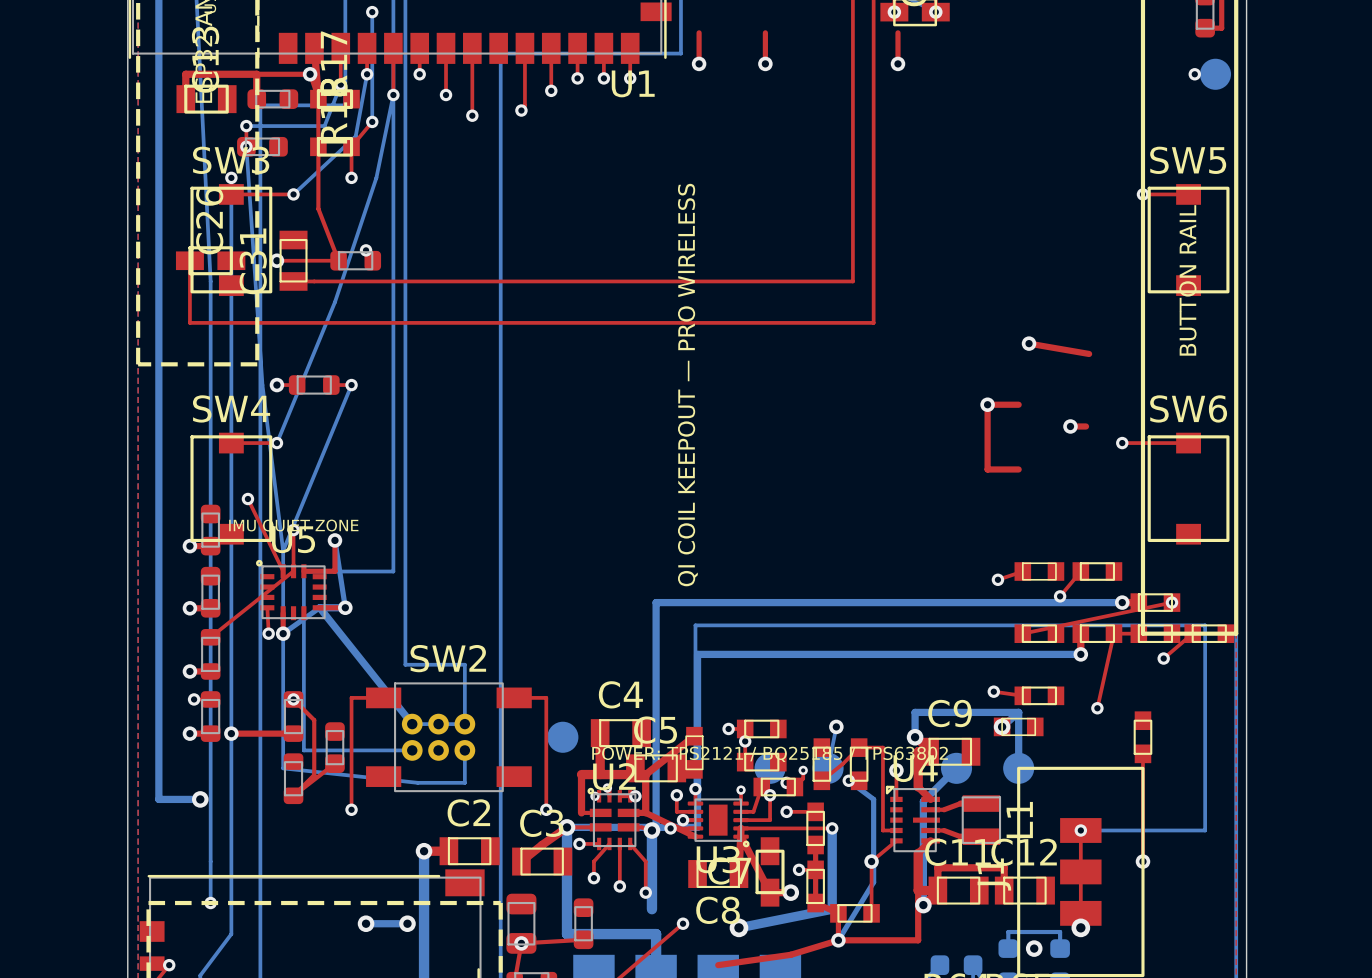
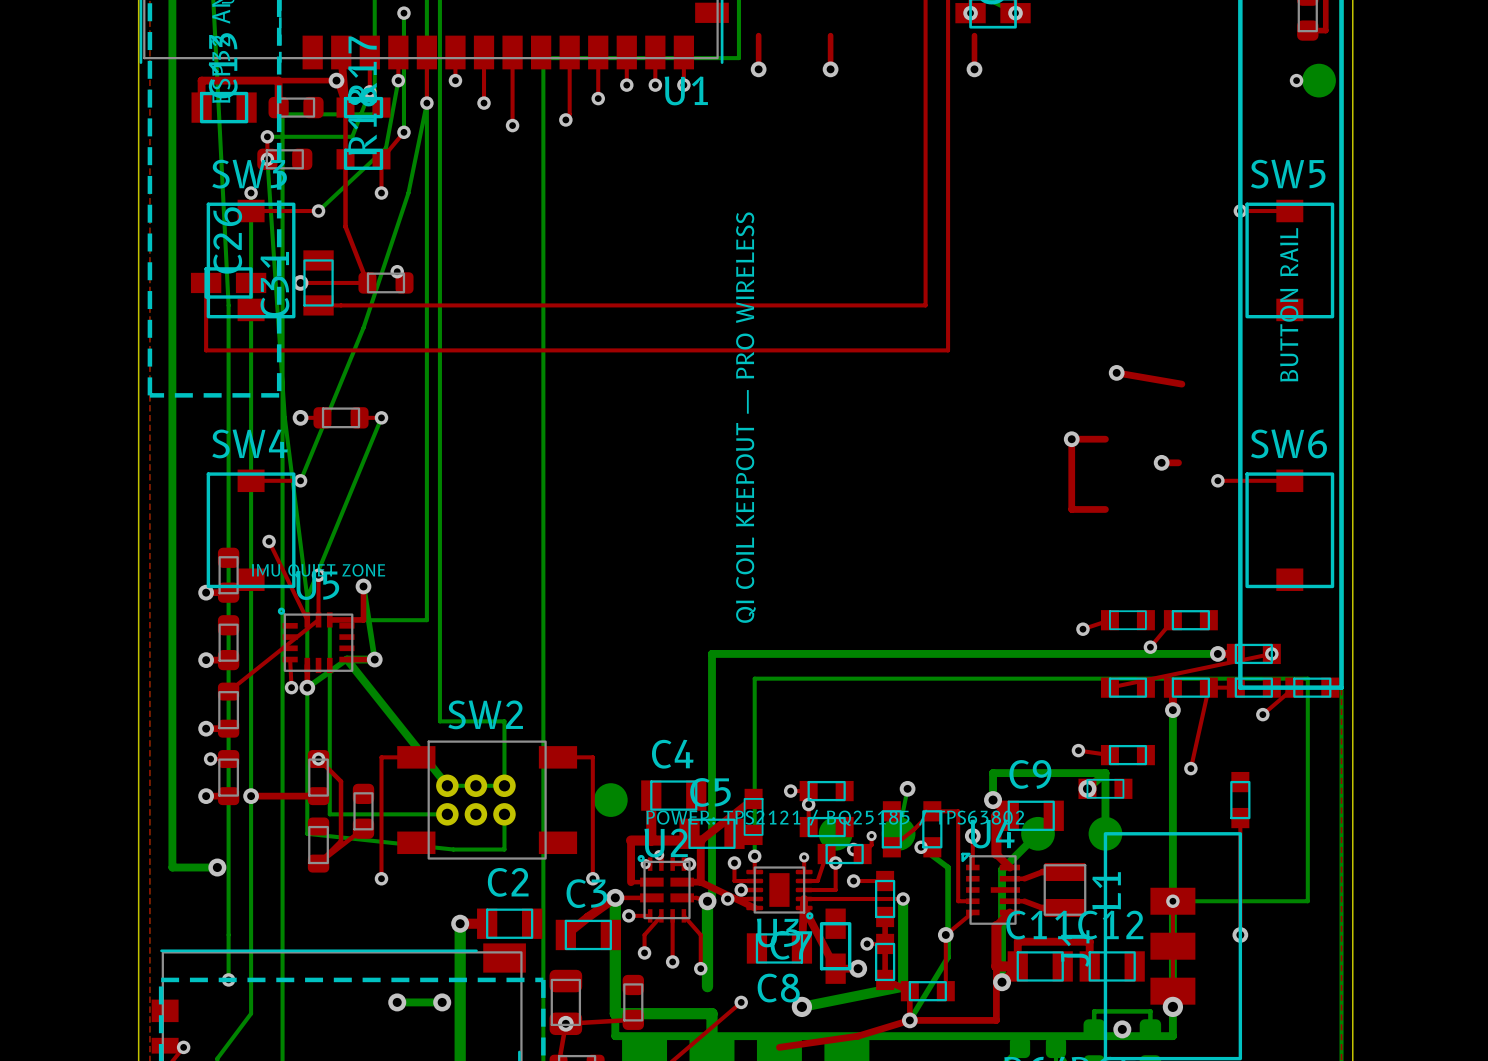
bottom track: (1080, 654) (697, 654) (697, 827) (567, 827) -> (1172, 710) (1172, 1036) (615, 1036) (615, 1013)

